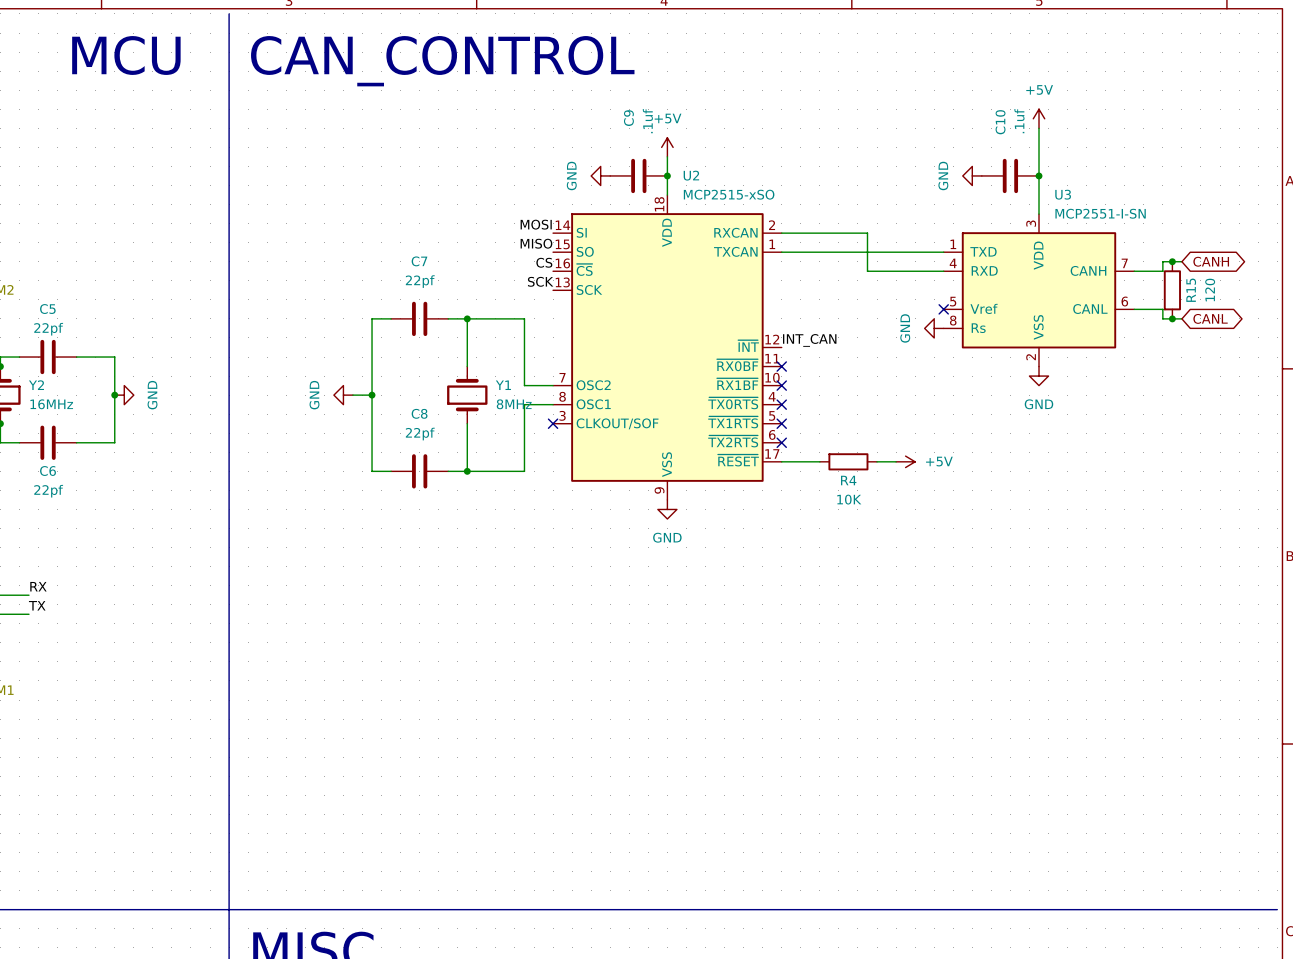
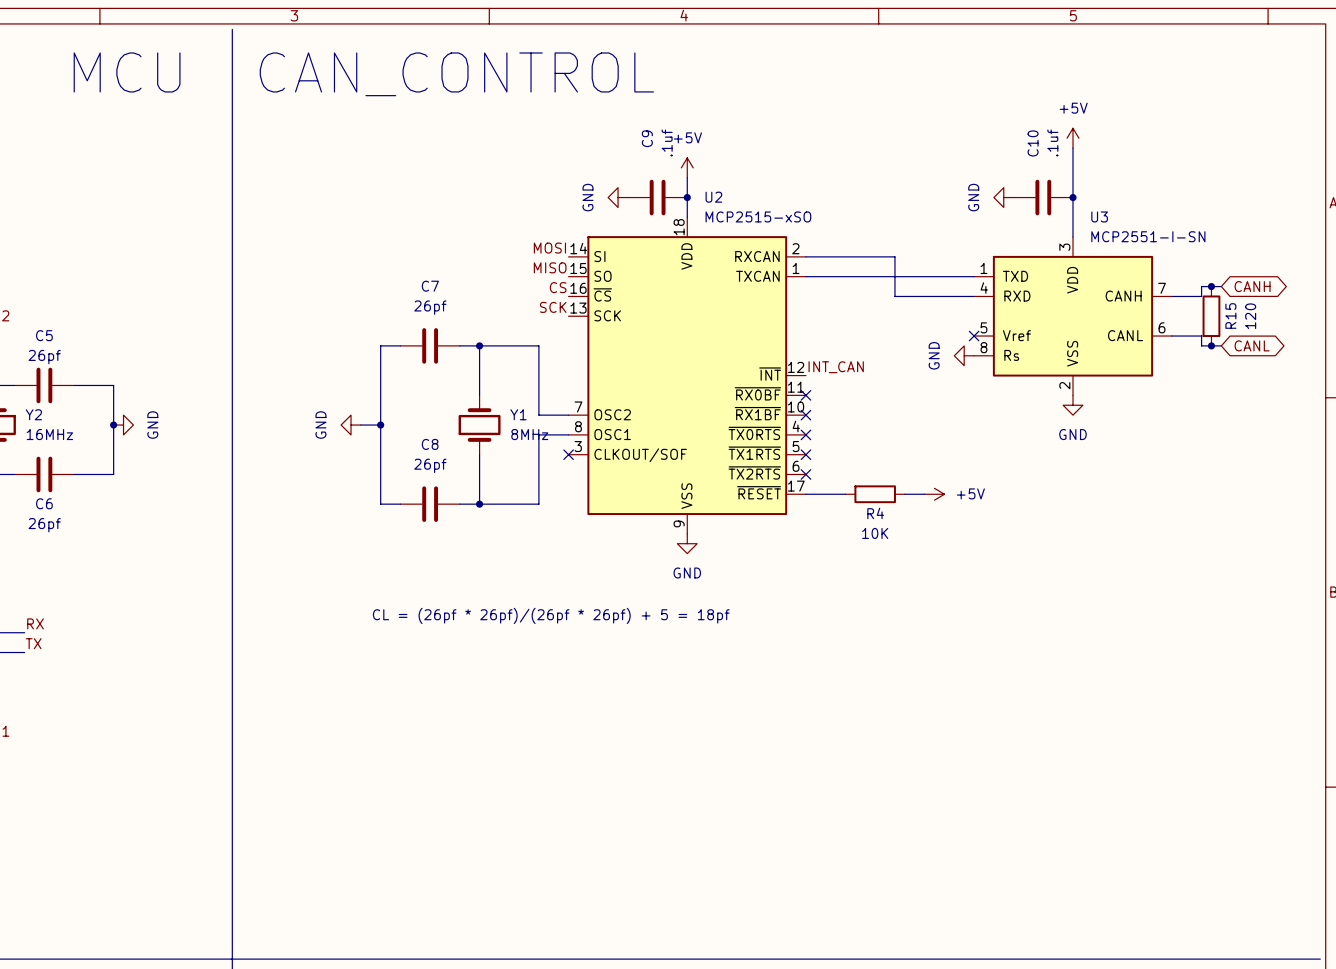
C7 value: 22pf (420, 281) -> 26pf (430, 307)
C5 value: 22pf (48, 329) -> 26pf (44, 357)
C8 value: 22pf (420, 434) -> 26pf (430, 465)
C6 value: 22pf (48, 491) -> 26pf (44, 525)
text: none -> CL = (26pf * 26pf)/(26pf * 26pf) + 5 = 18pf (551, 615)

